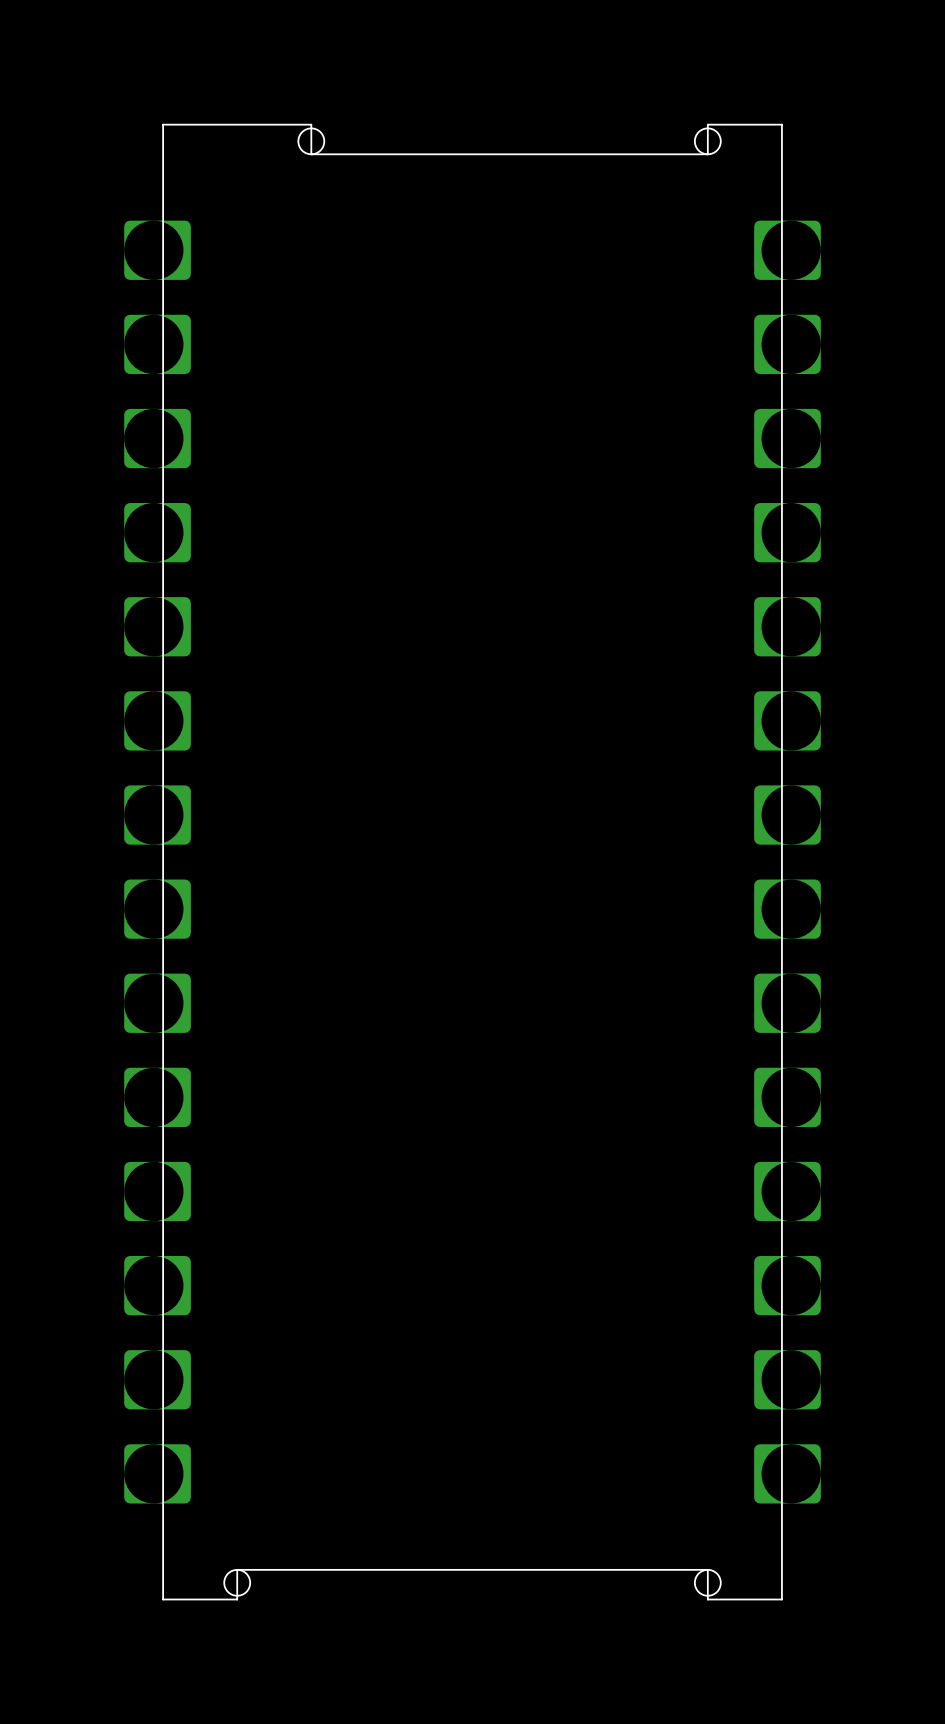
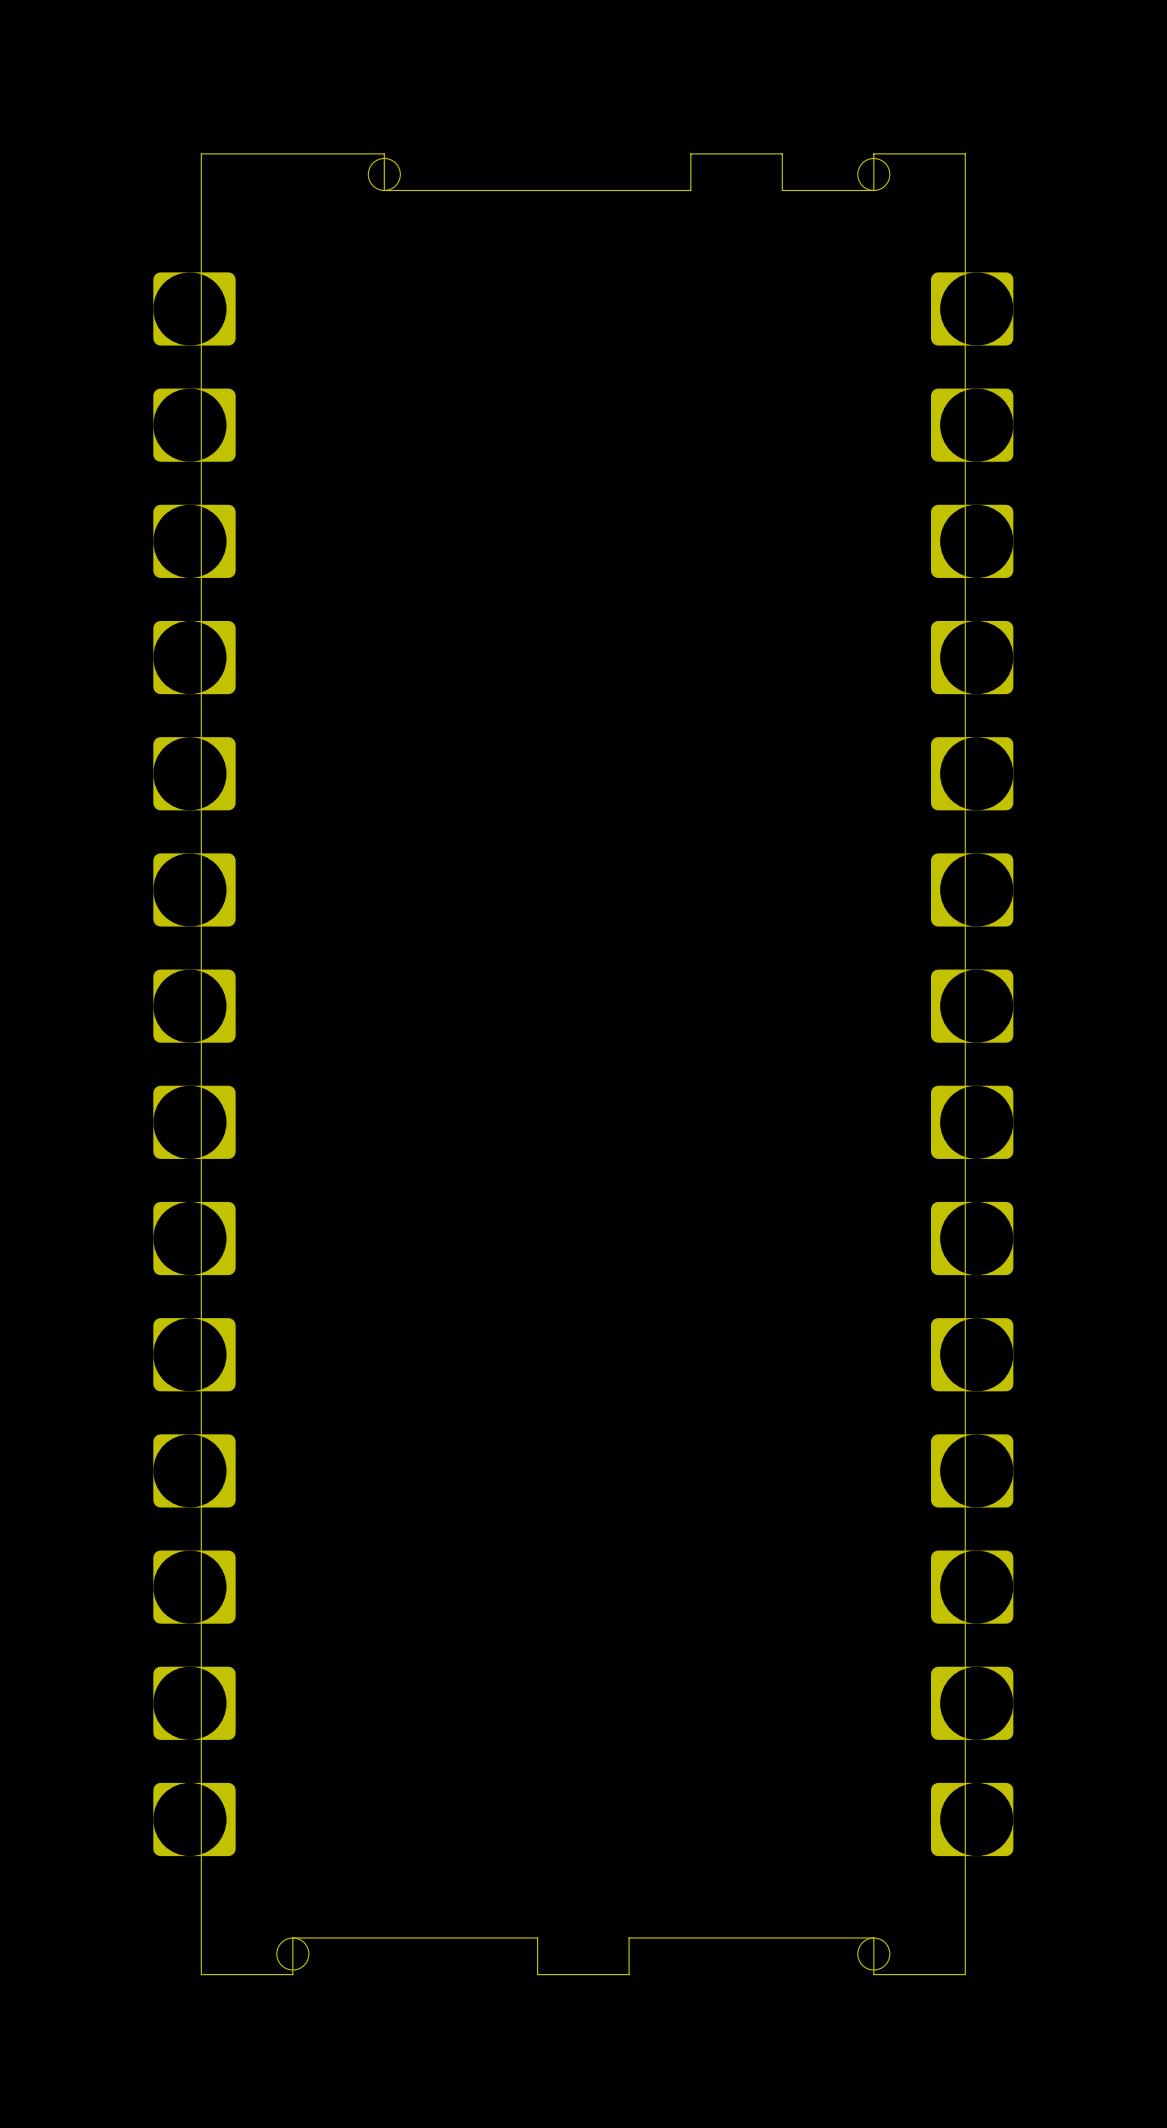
board edge: (559, 154) (633, 154) -> (690, 190) (690, 153) (782, 153) (782, 190)
board edge: (435, 1569) (509, 1569) -> (537, 1937) (537, 1974) (629, 1974) (629, 1937)

